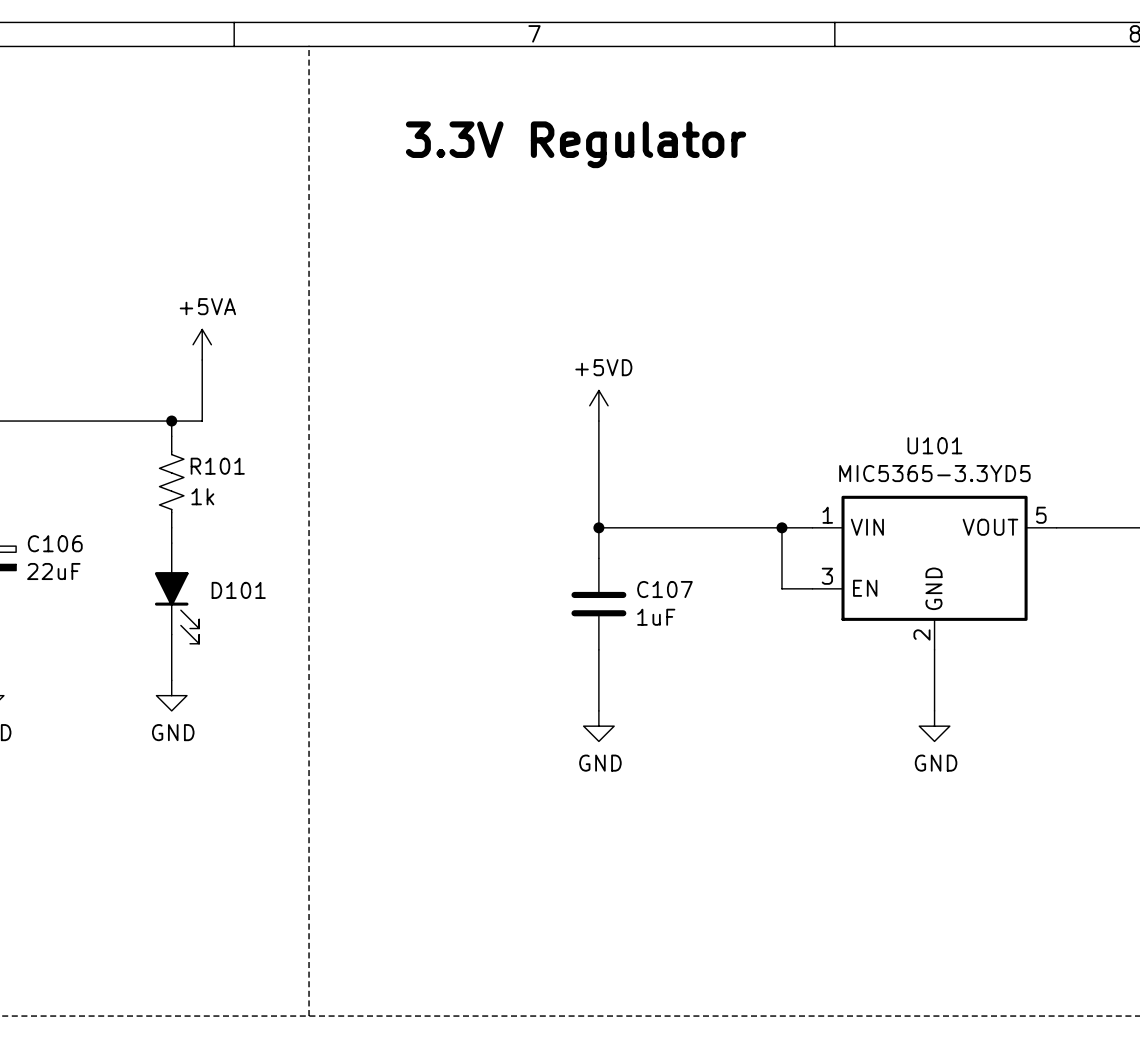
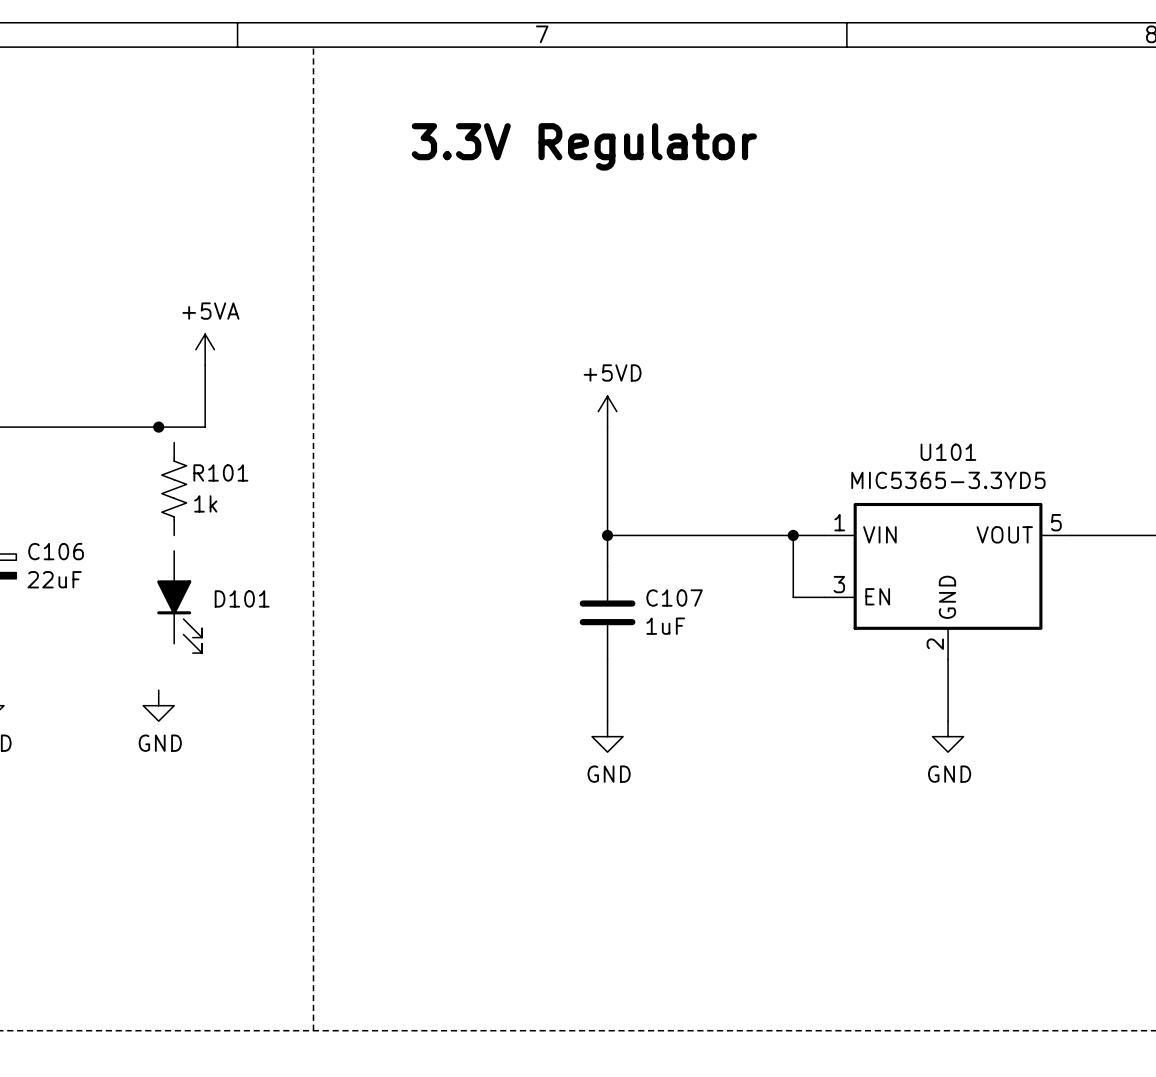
wire: (171, 421) (171, 436) -> none
junction position: (171, 421) -> (158, 427)
wire: (171, 527) (171, 543) -> none
wire: (171, 634) (171, 680) -> none
power symbol position: GND (171, 695) -> GND (158, 705)

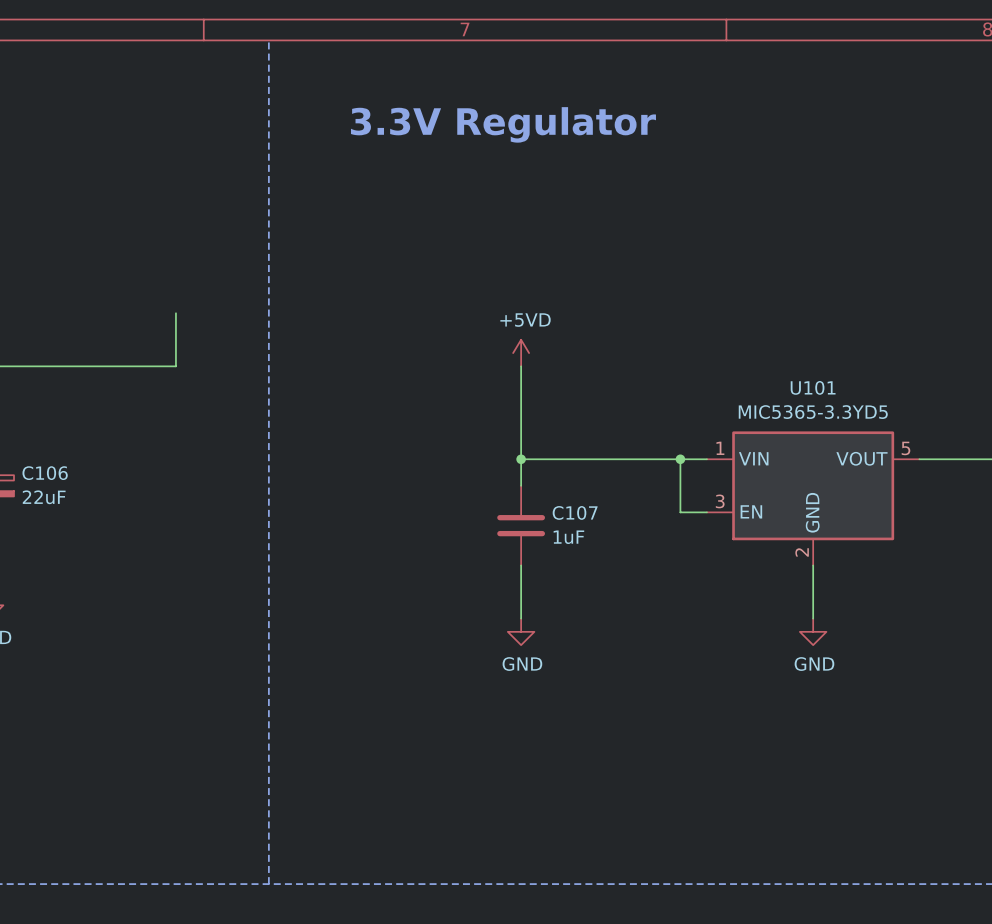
power symbol: +5VA (205, 349) -> none
junction: (158, 427) -> none
R101: 1k (174, 489) -> none
D101: (179, 602) -> none
power symbol: GND (158, 705) -> none

